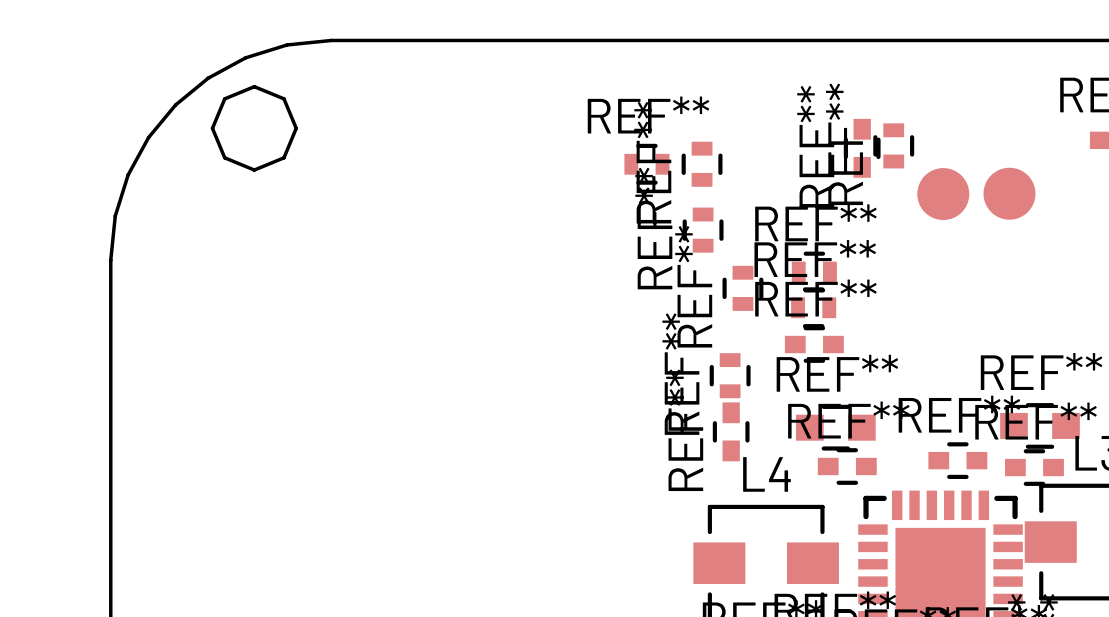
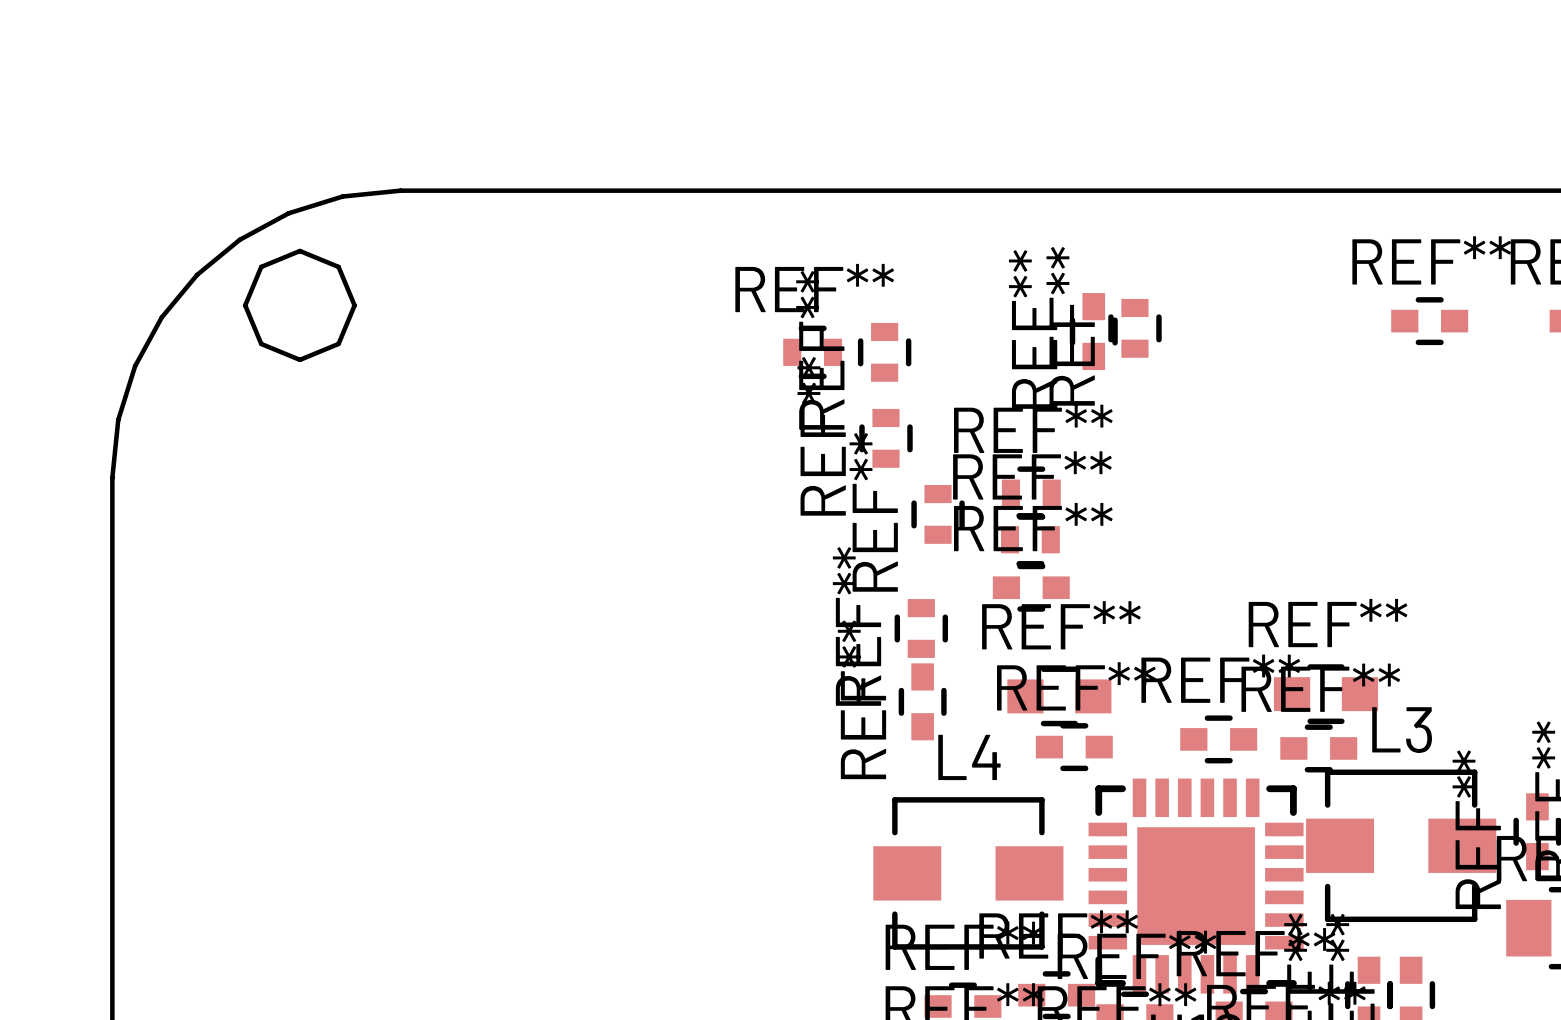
part: (1009, 193) -> none
part: (943, 194) -> none

